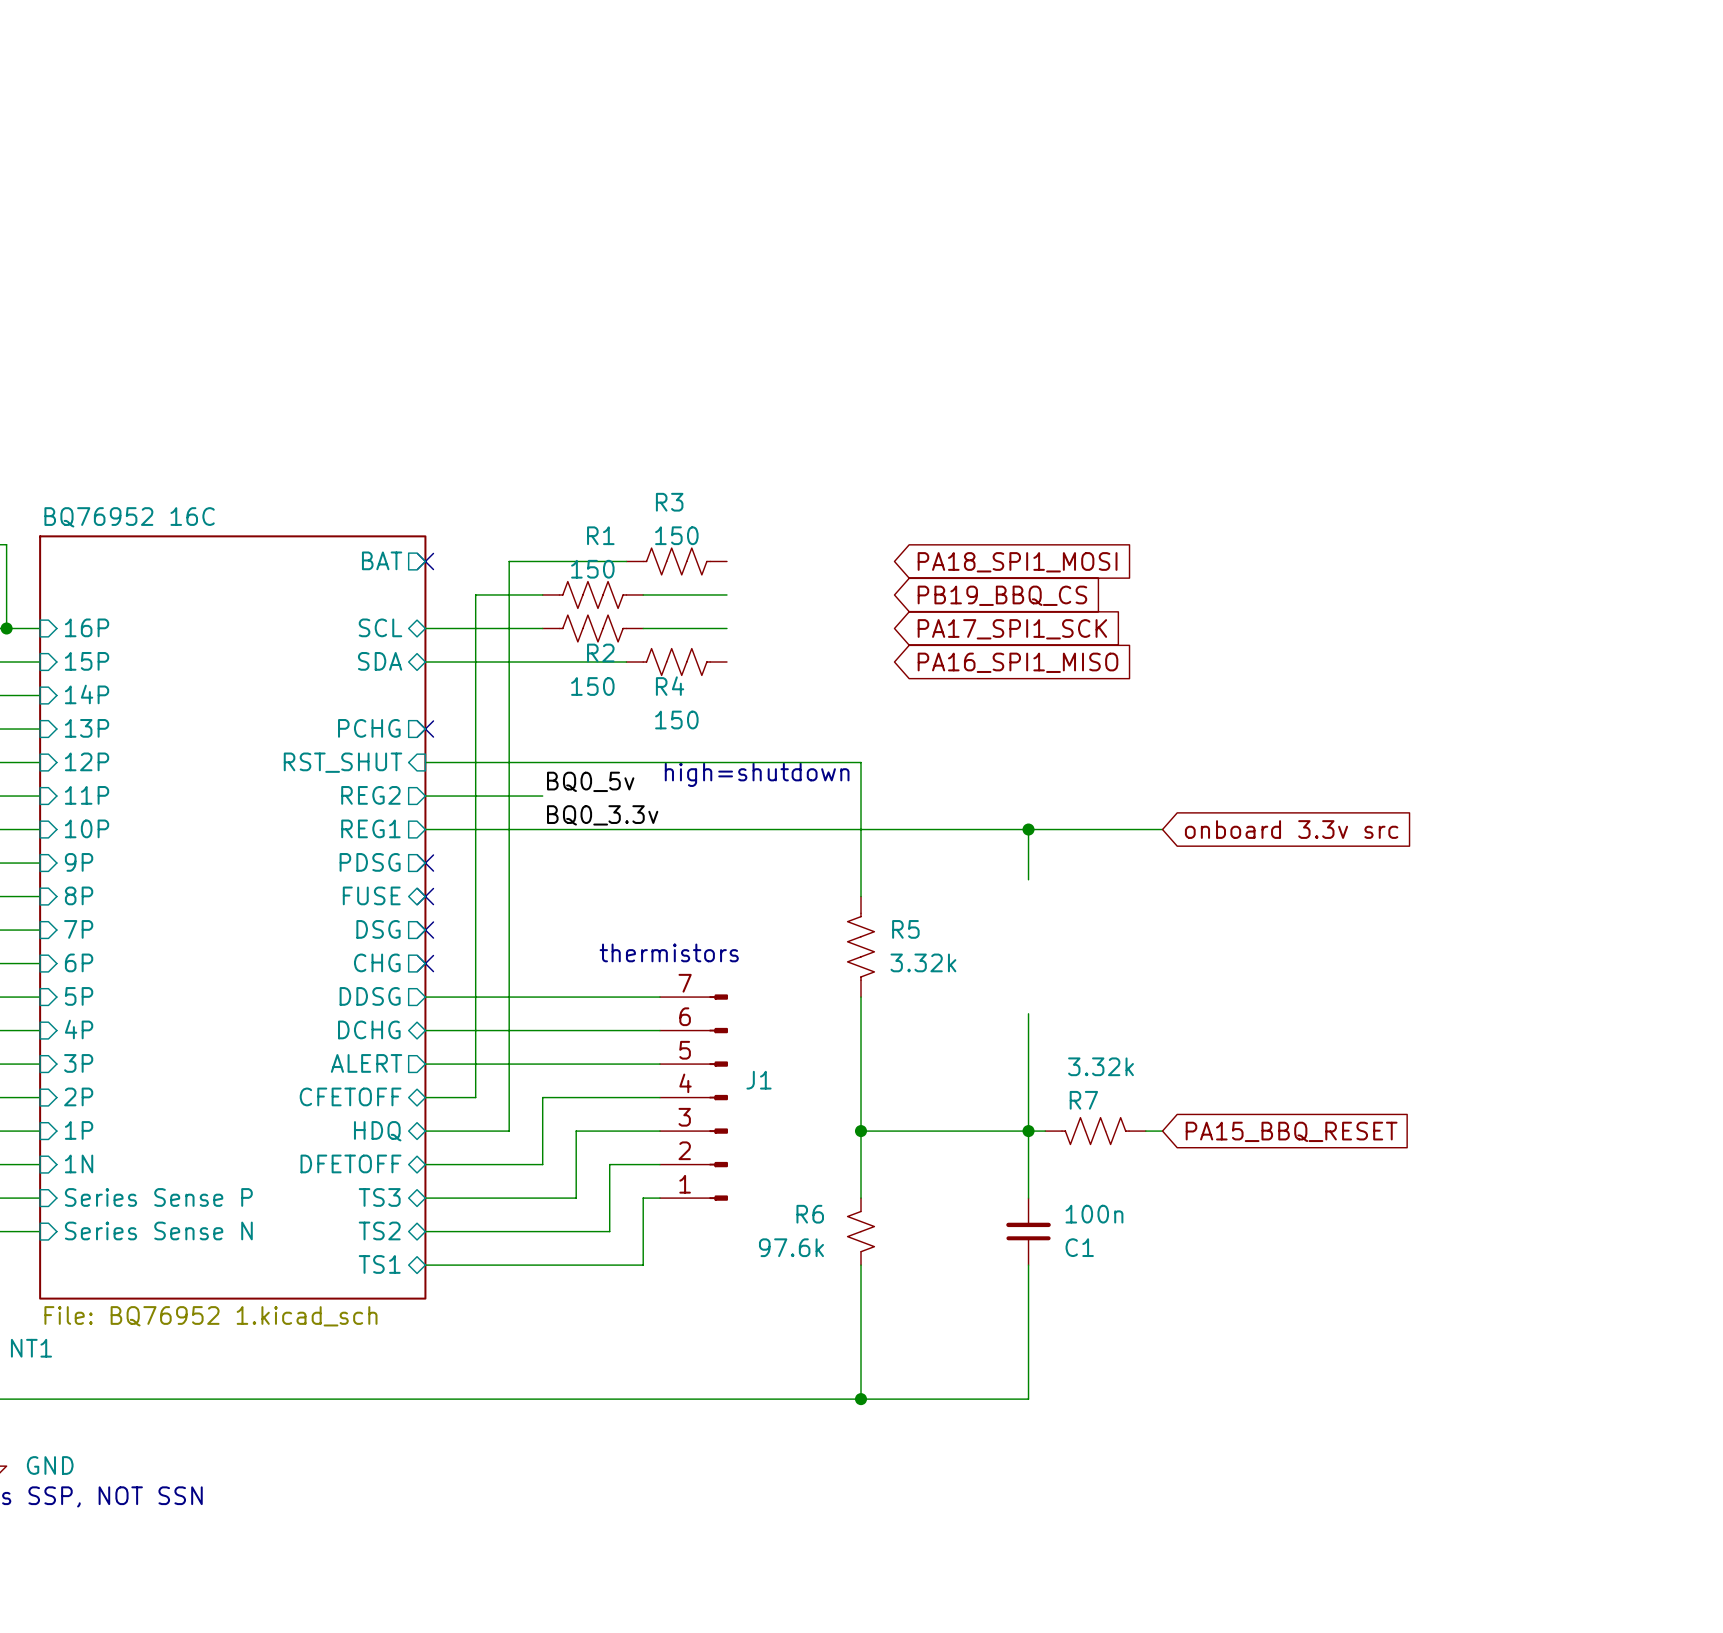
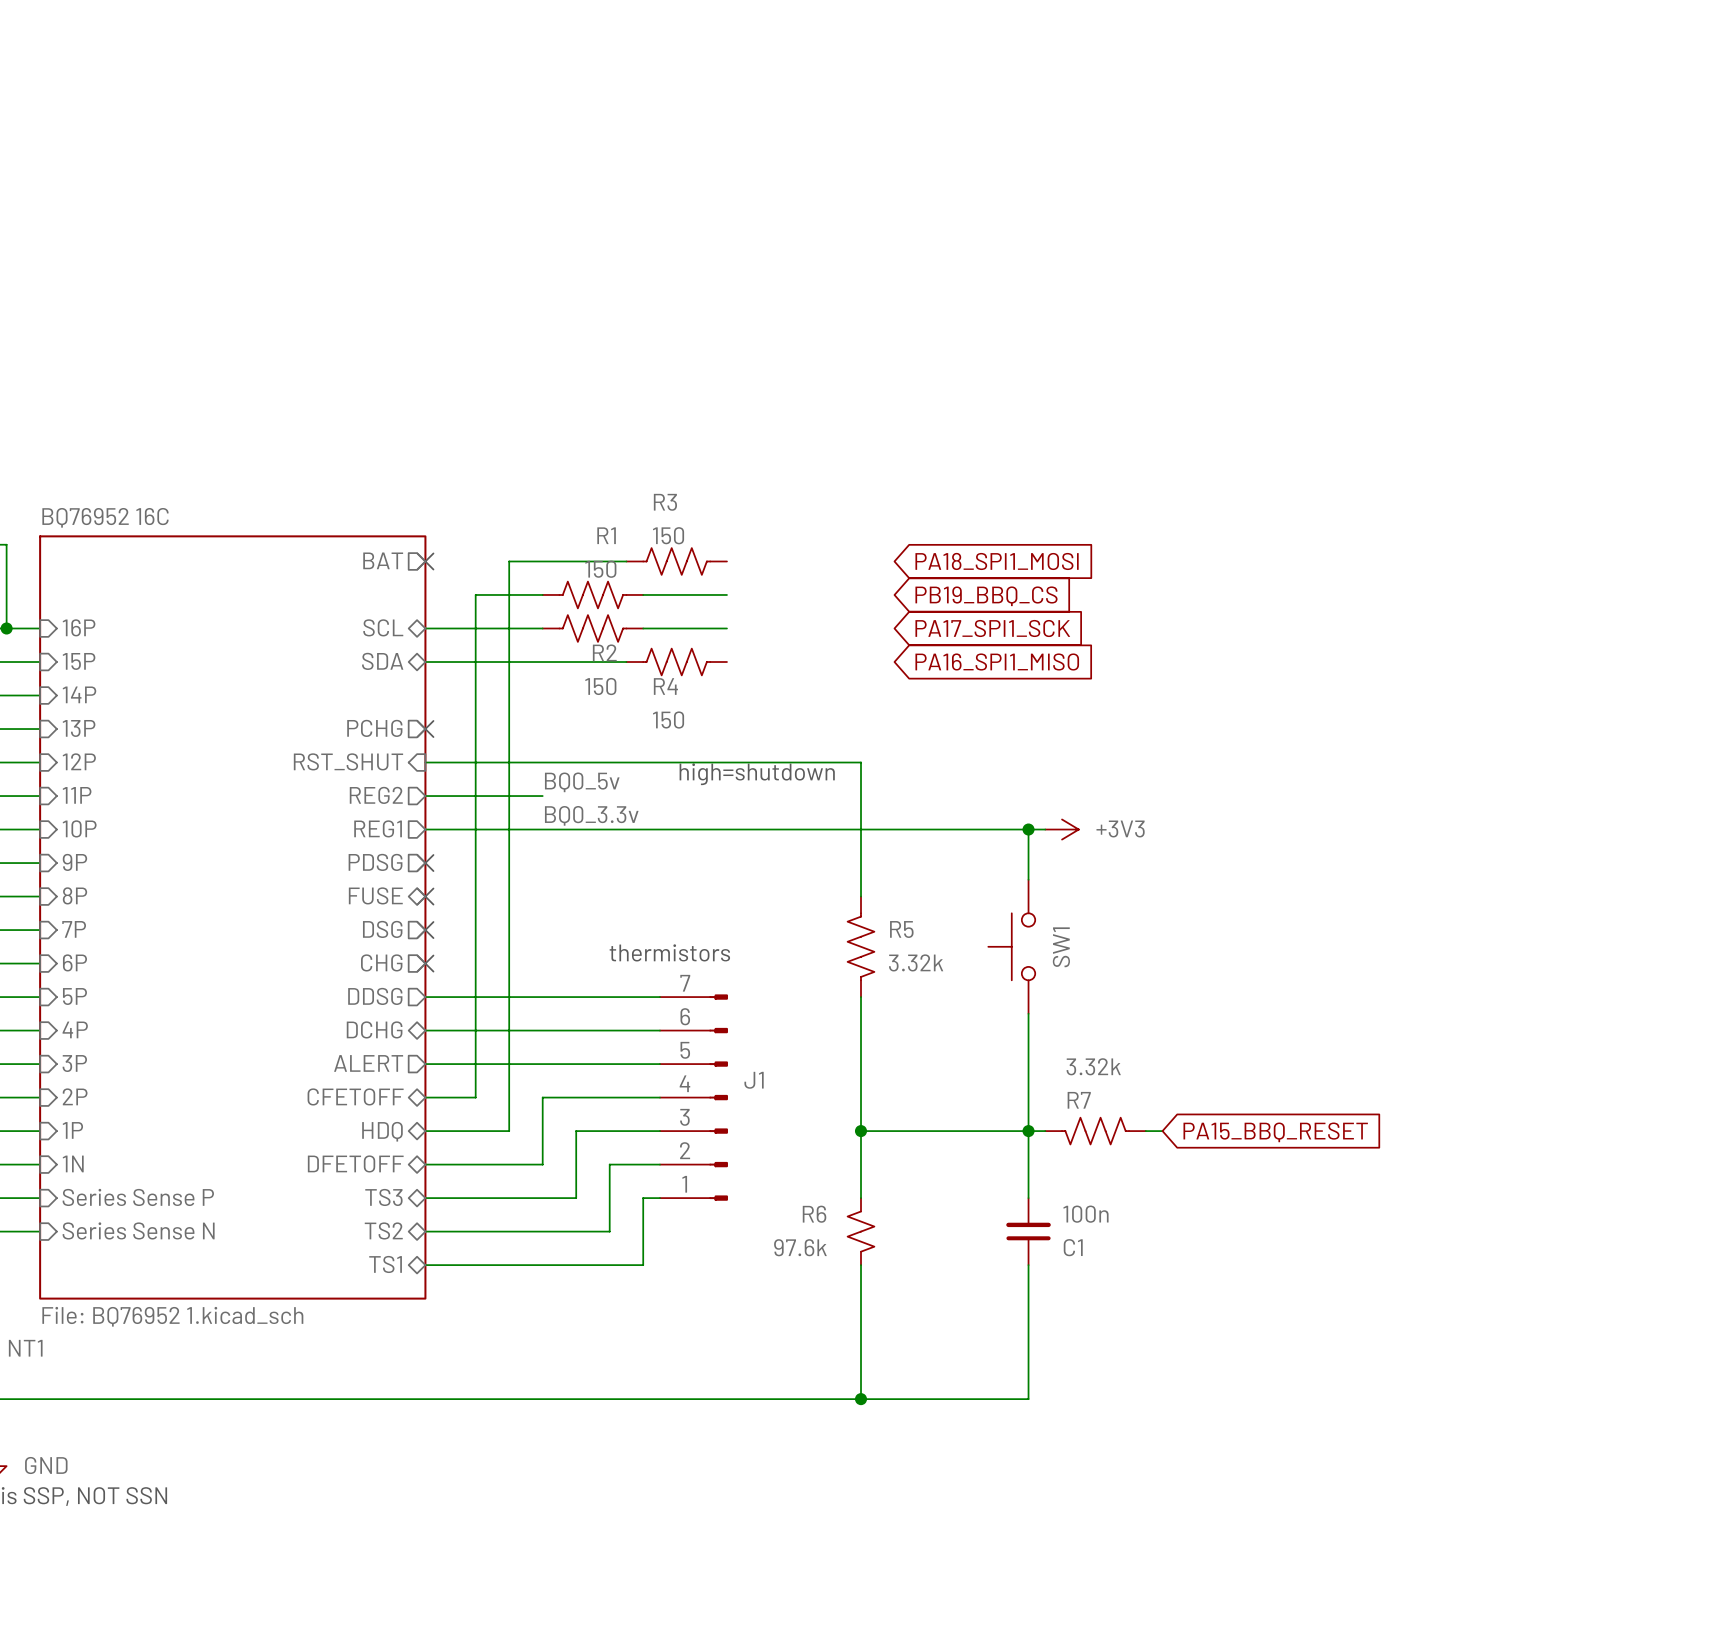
wire: (1045, 829) (1162, 829) -> none
power symbol: none -> +3V3 (1062, 829)
global label: onboard 3.3v src (1291, 829) -> none
SW1: none -> (1011, 946)

